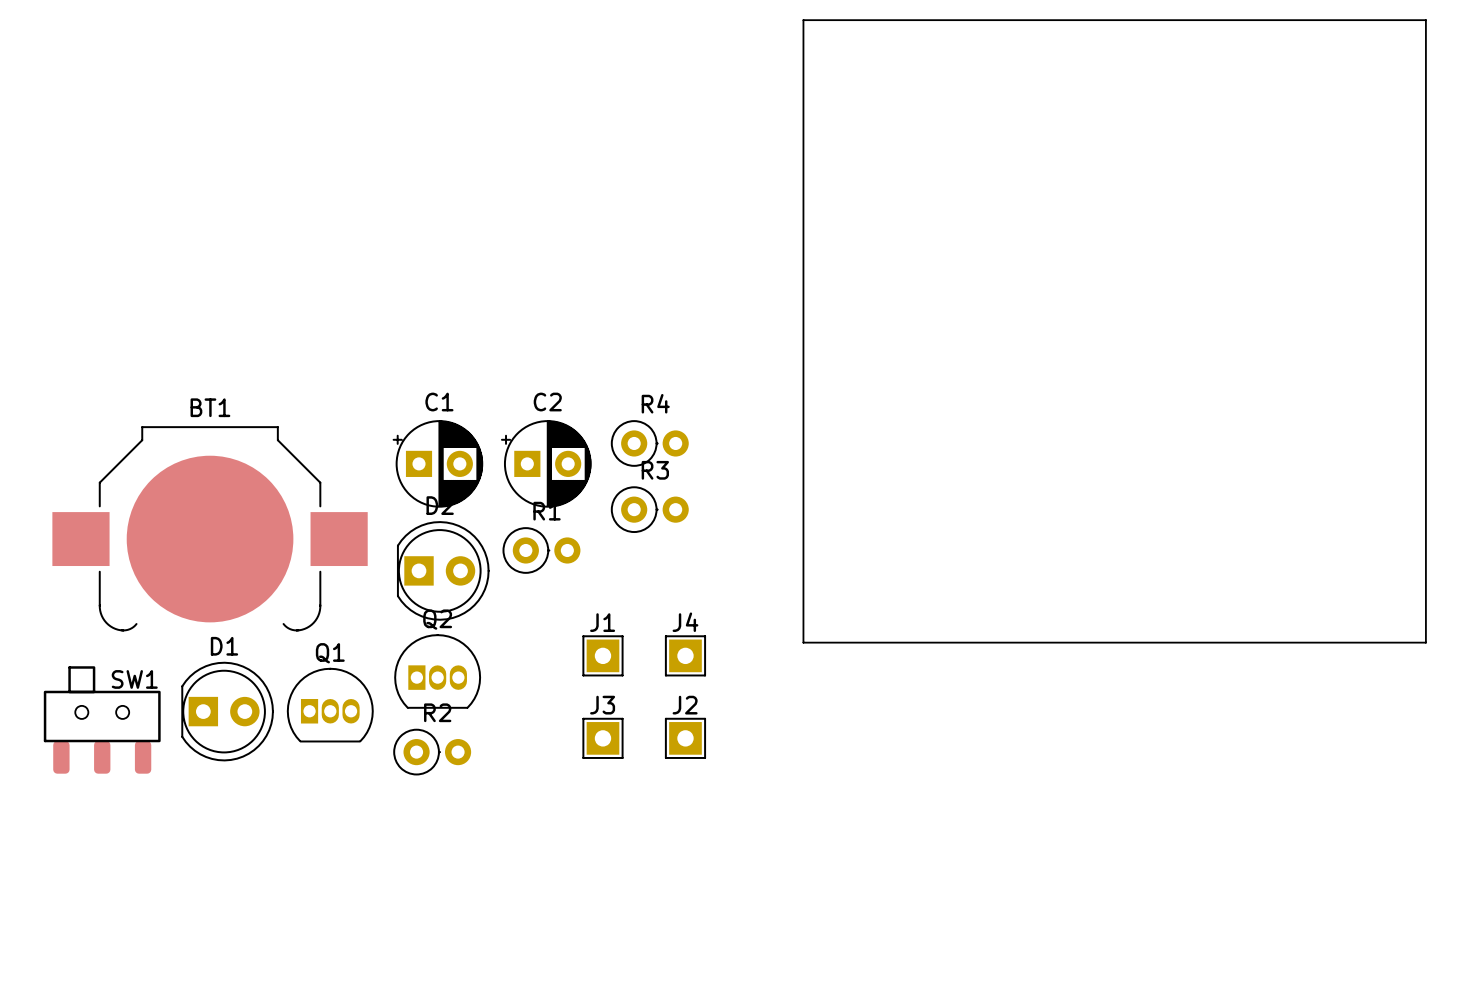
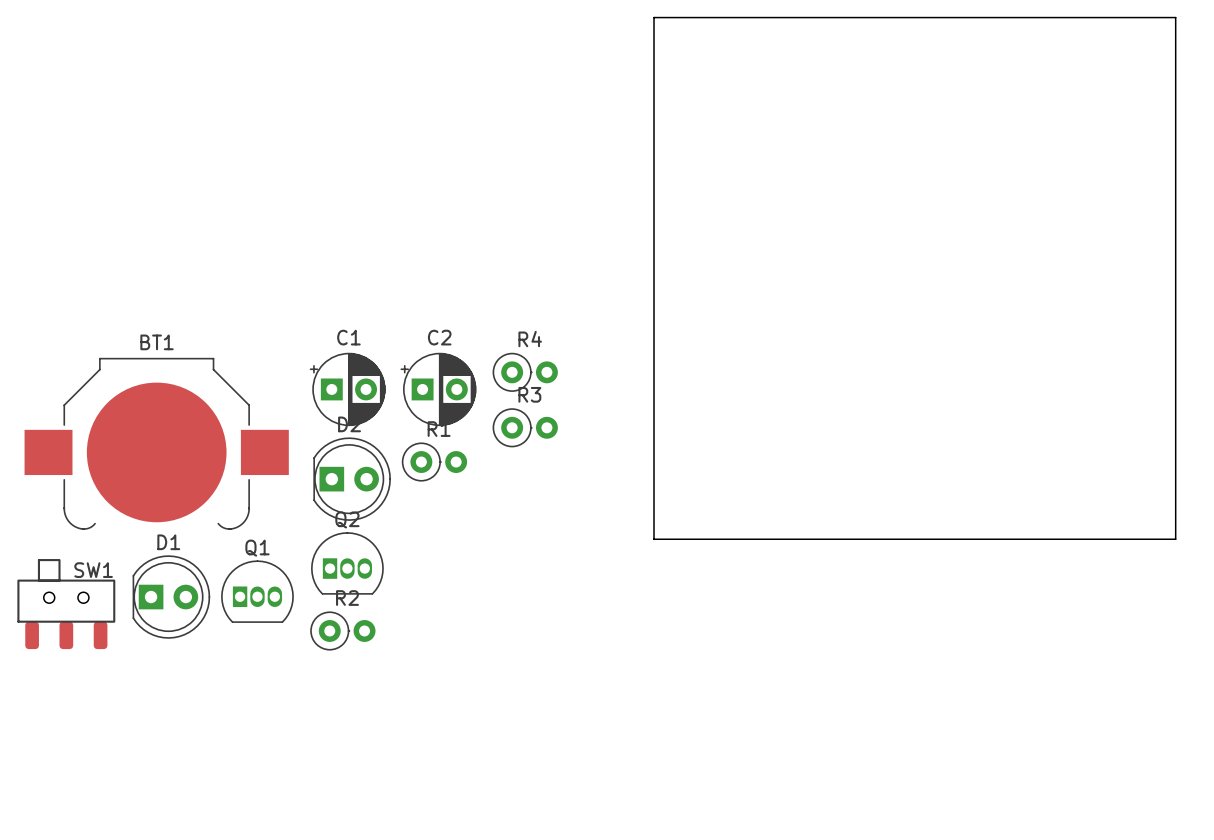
J1: (602, 655) -> none
J4: (685, 655) -> none
J3: (602, 738) -> none
J2: (685, 738) -> none

